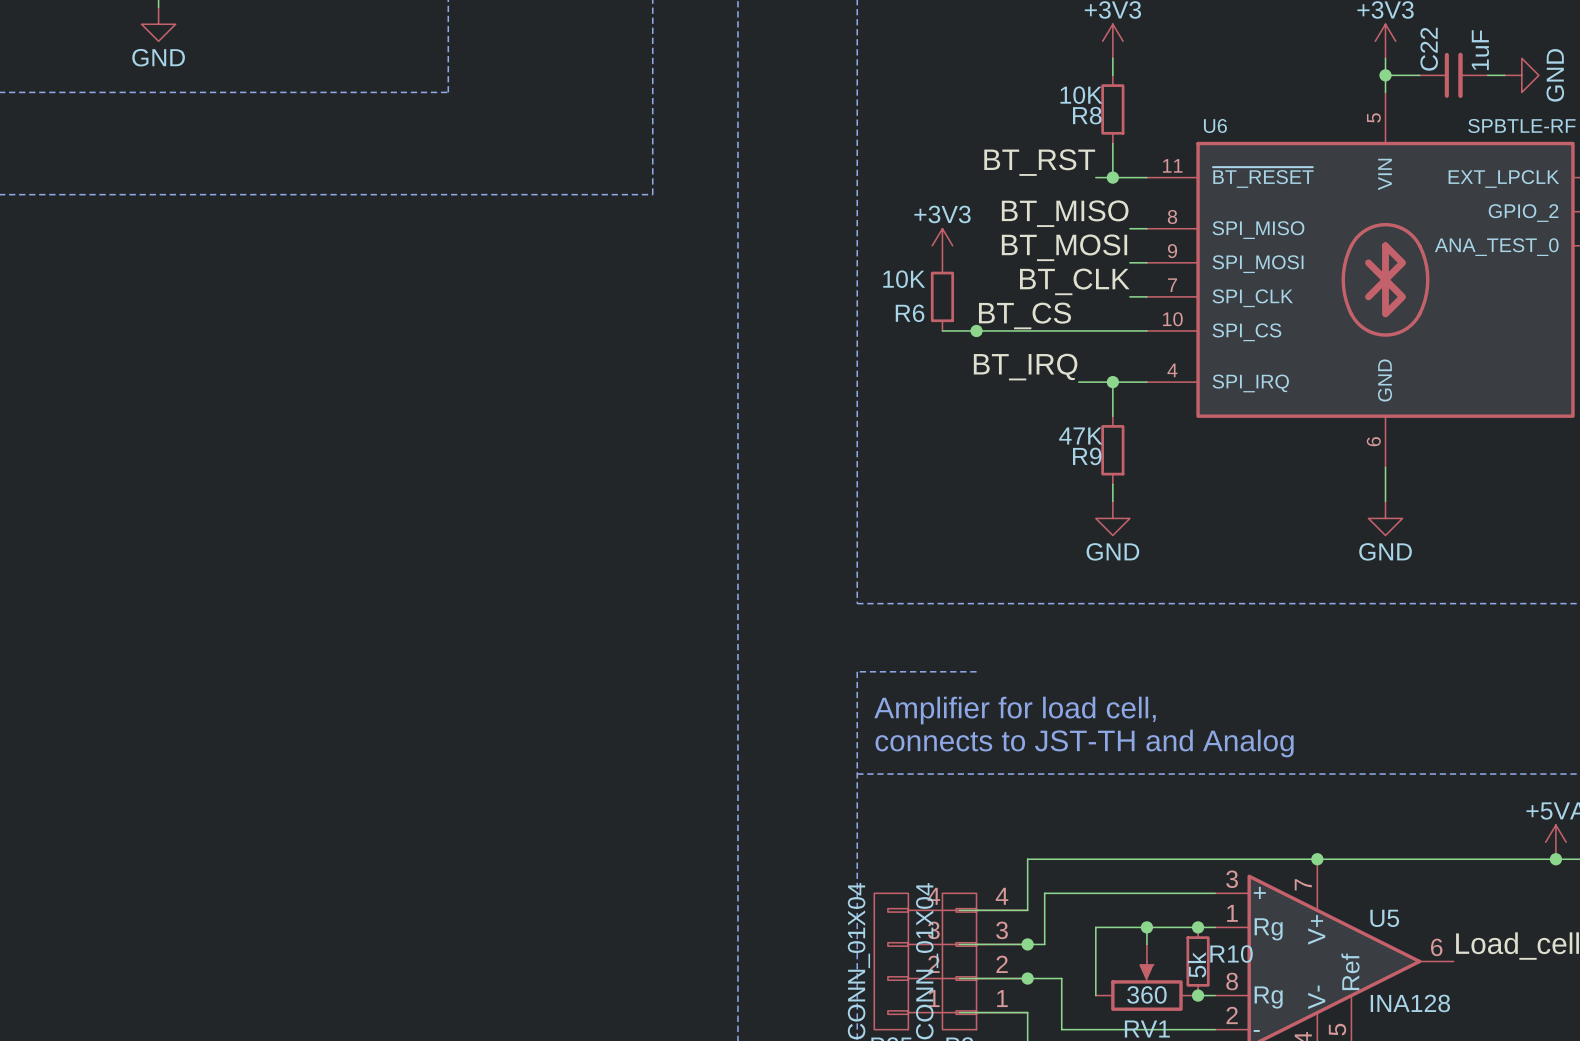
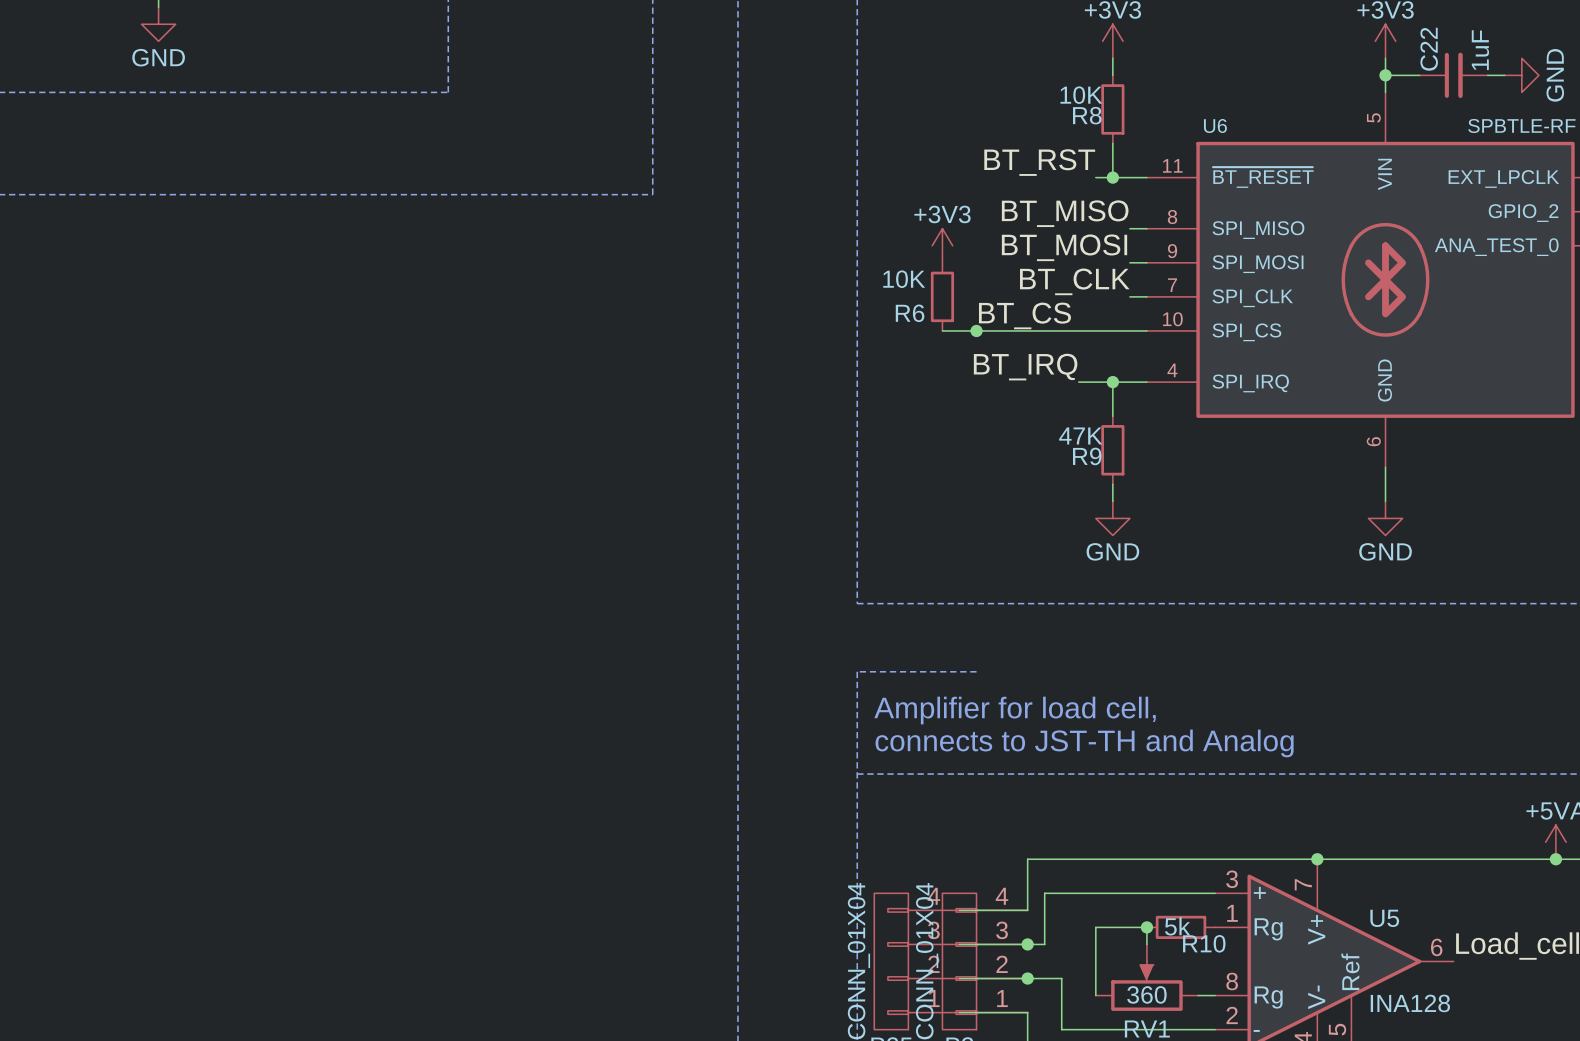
wire: (1146, 927) (1215, 927) -> none
junction: (1198, 927) -> none
R10 rotation: 0° (1198, 961) -> 90° clockwise (1181, 927)
junction: (1198, 995) -> none

